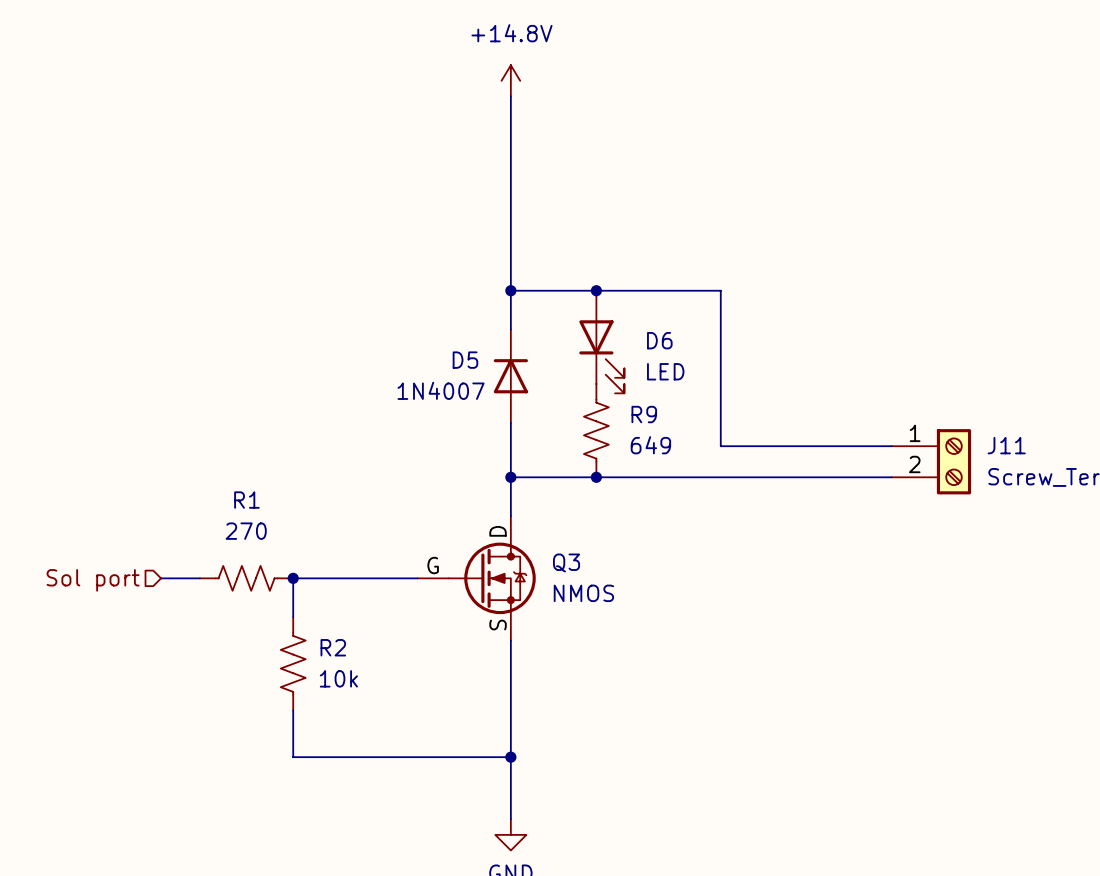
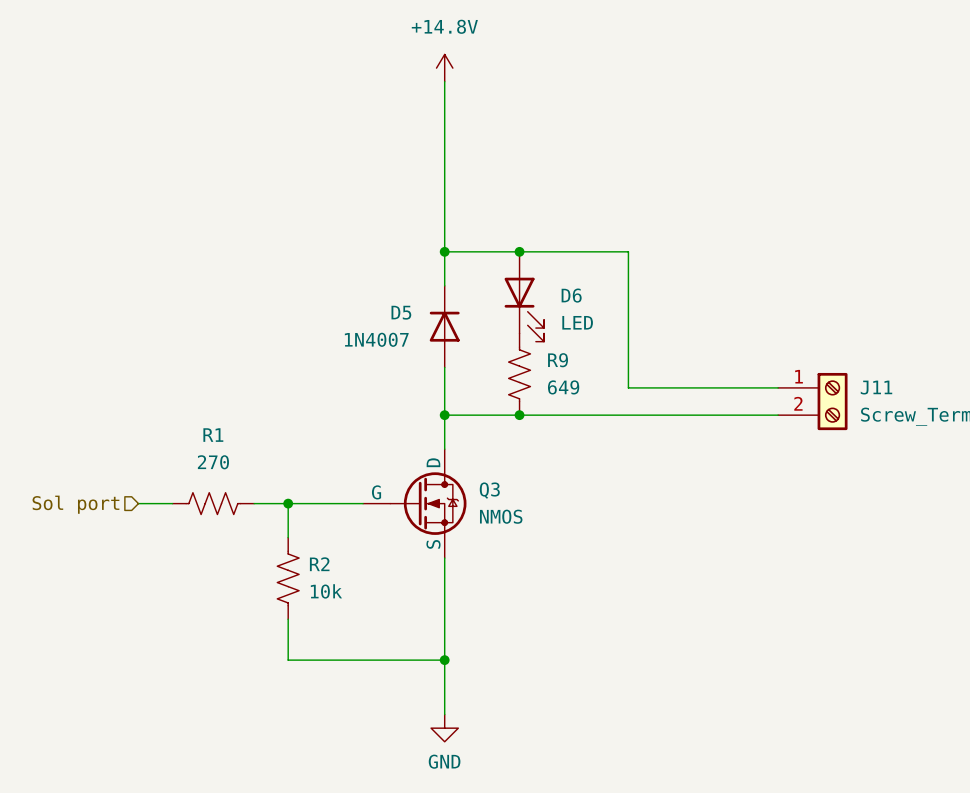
wire: (293, 578) (293, 617) -> (288, 503) (288, 537)
junction position: (293, 578) -> (288, 503)
R2 position: (293, 663) -> (288, 578)
wire: (293, 710) (293, 757) (332, 757) -> (288, 619) (288, 660)

